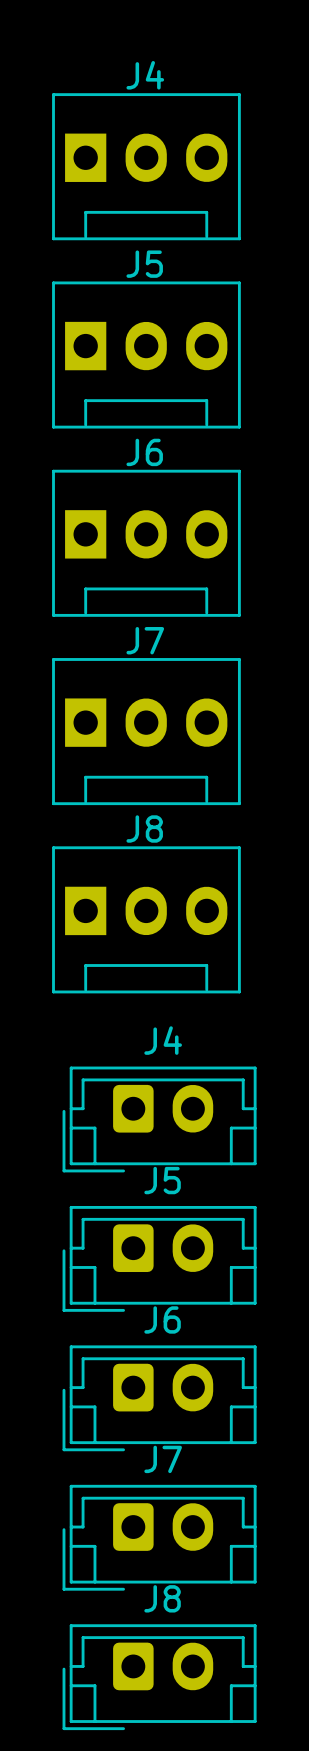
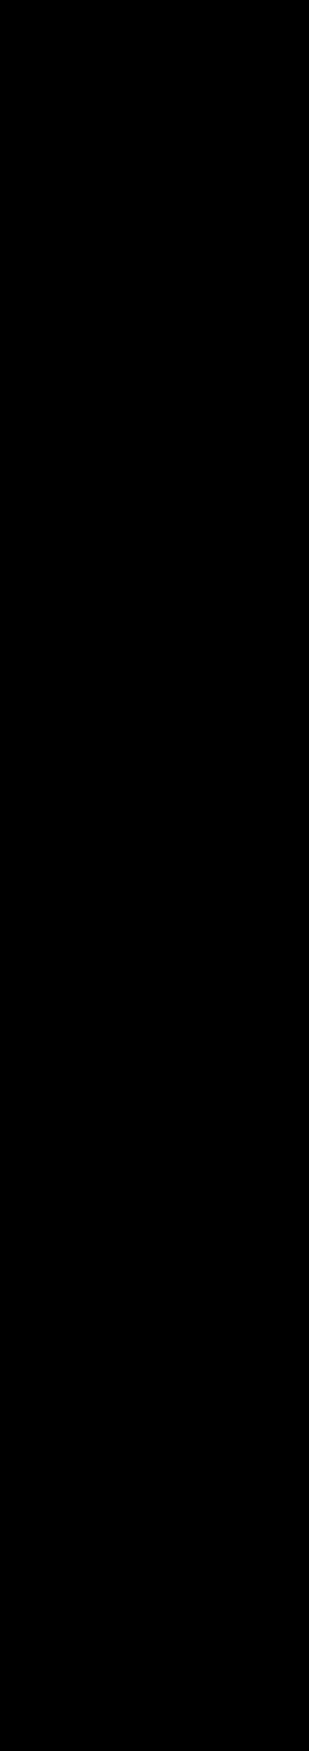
J4: (146, 166) -> none
J5: (146, 355) -> none
J6: (146, 543) -> none
J7: (146, 731) -> none
J8: (146, 919) -> none
J4: (159, 1119) -> none
J5: (159, 1258) -> none
J6: (159, 1398) -> none
J7: (159, 1537) -> none
J8: (159, 1677) -> none

